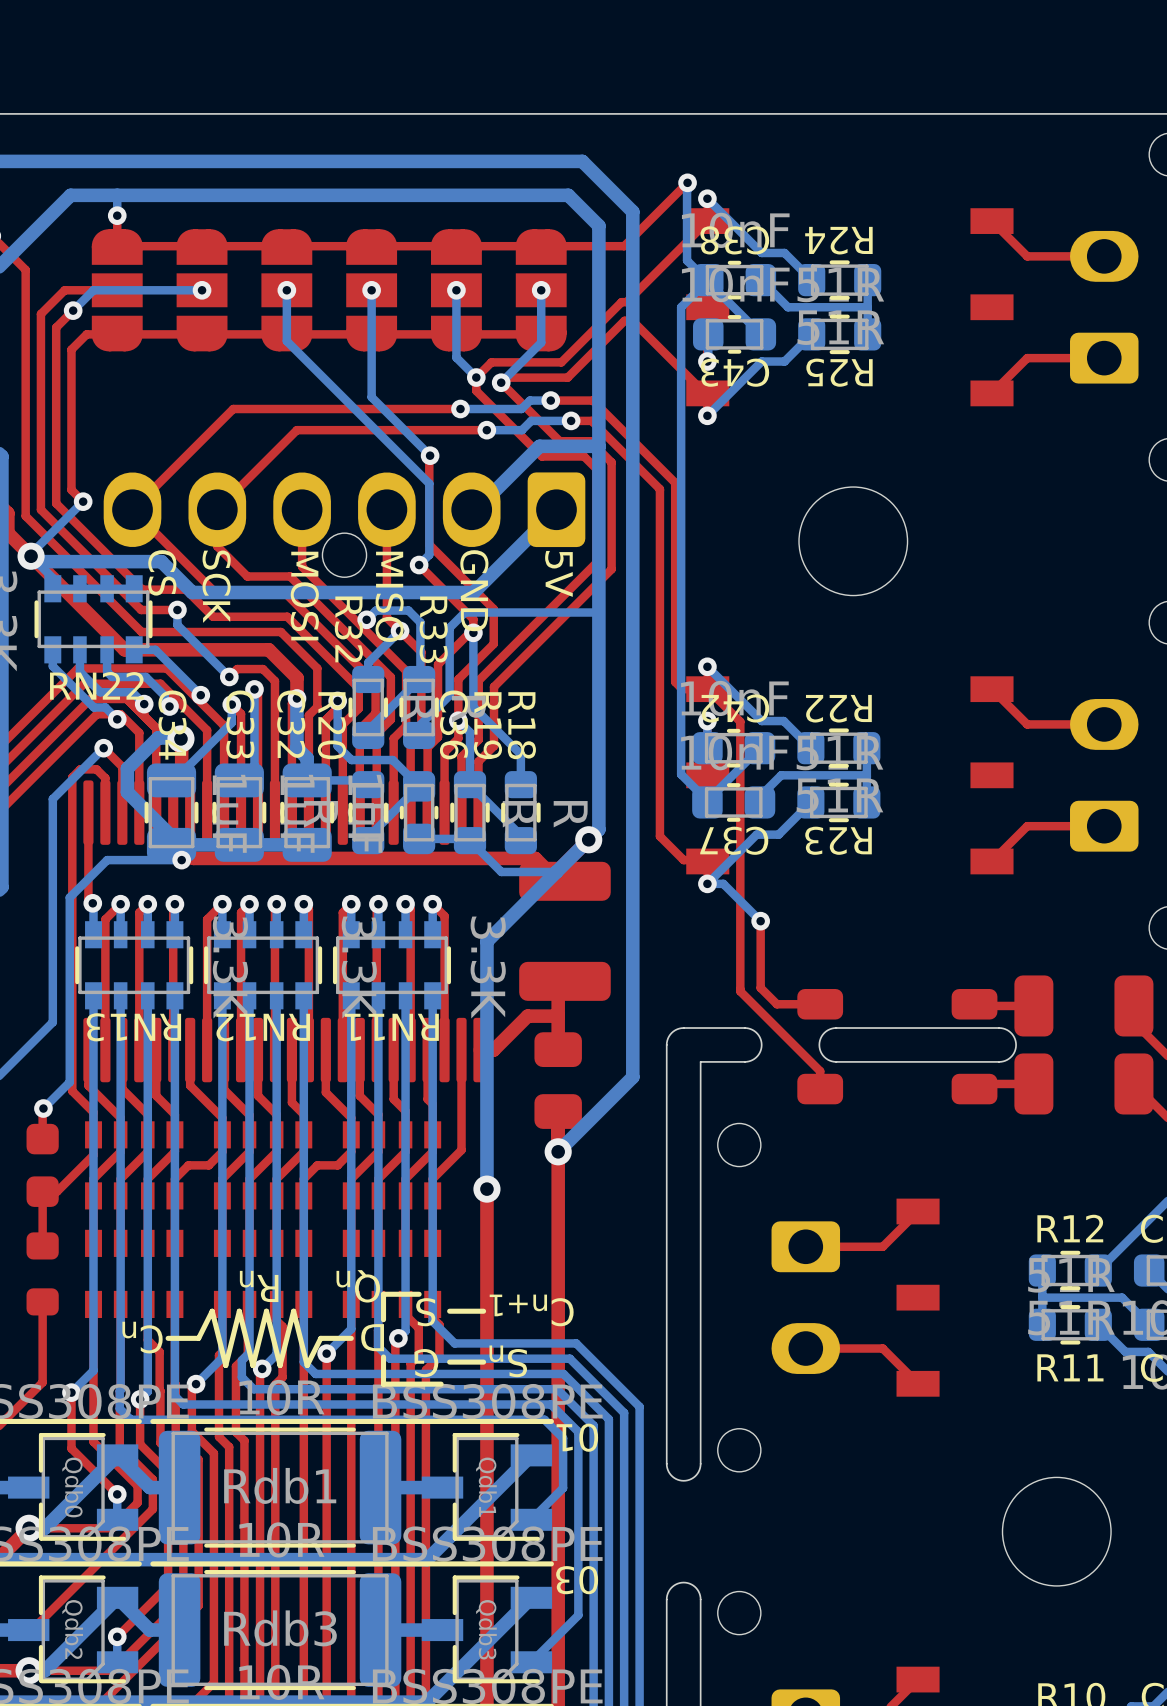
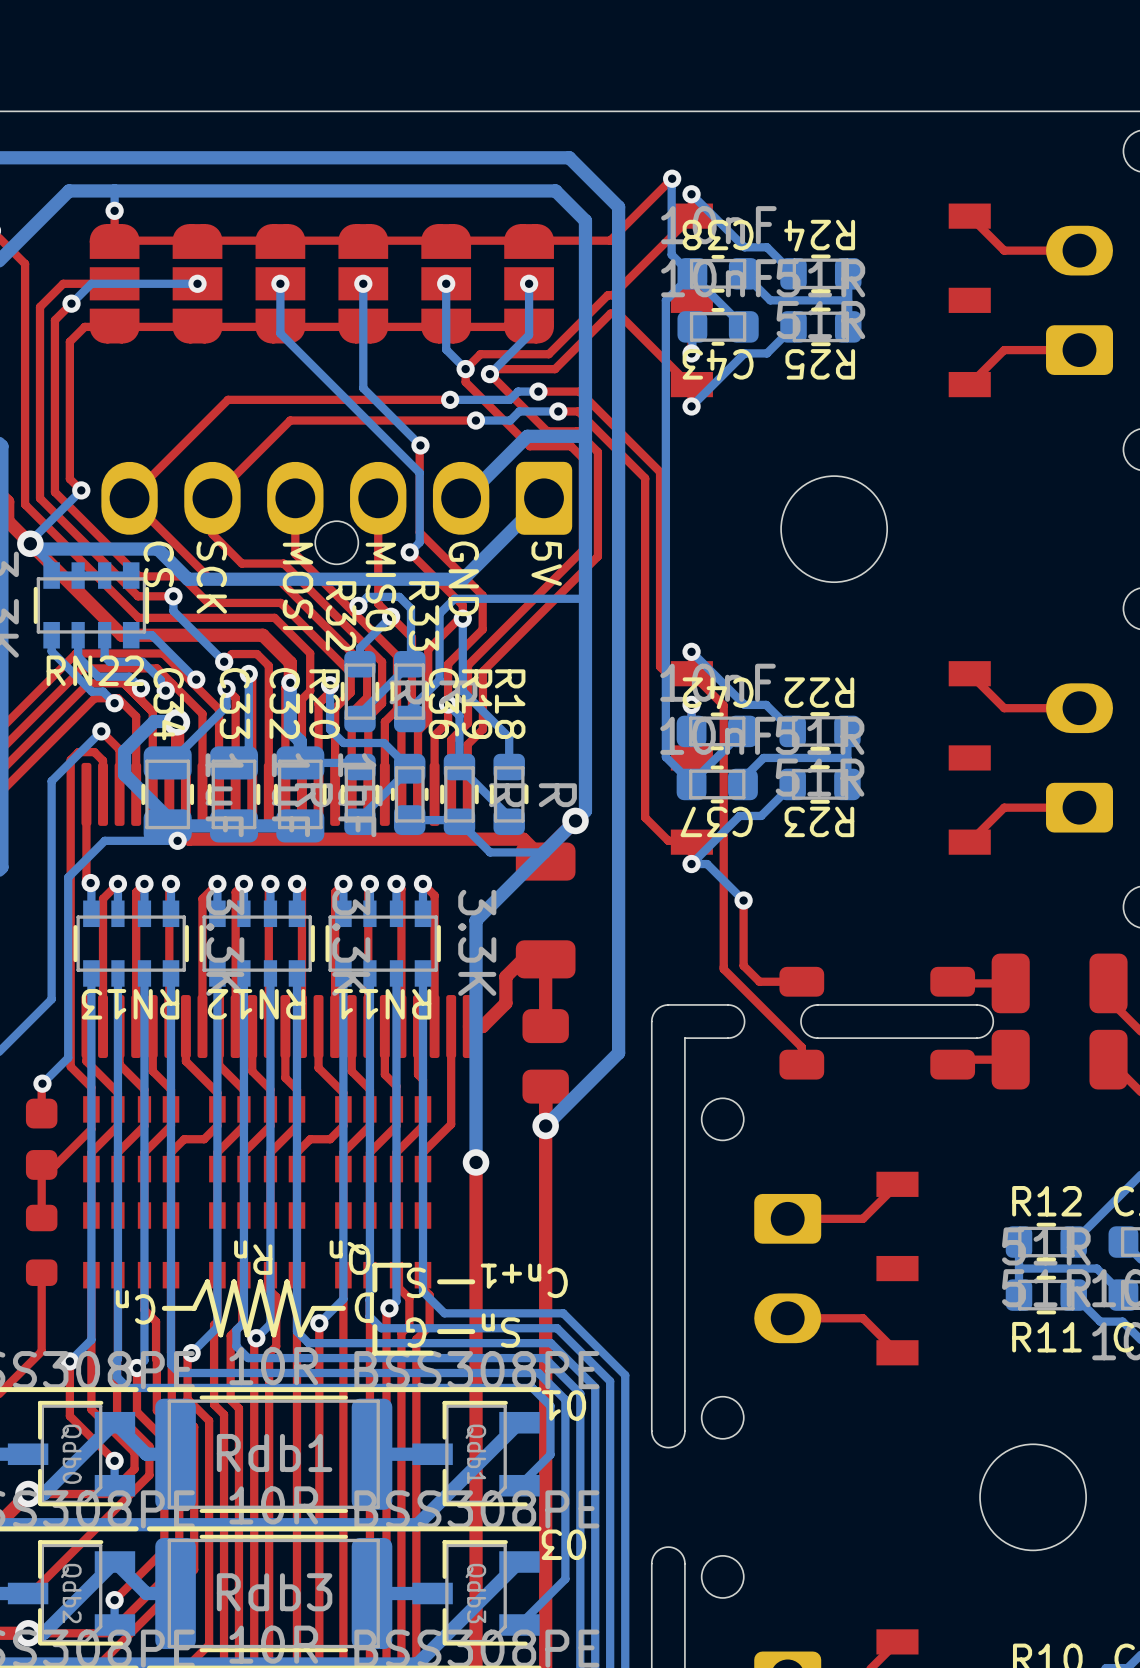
part footprint: [519, 861, 611, 1001] -> [515, 842, 576, 979]
top track: (558, 1016) (527, 1016) (517, 1026) -> (545, 959) (523, 959) (505, 976) (505, 1003)

